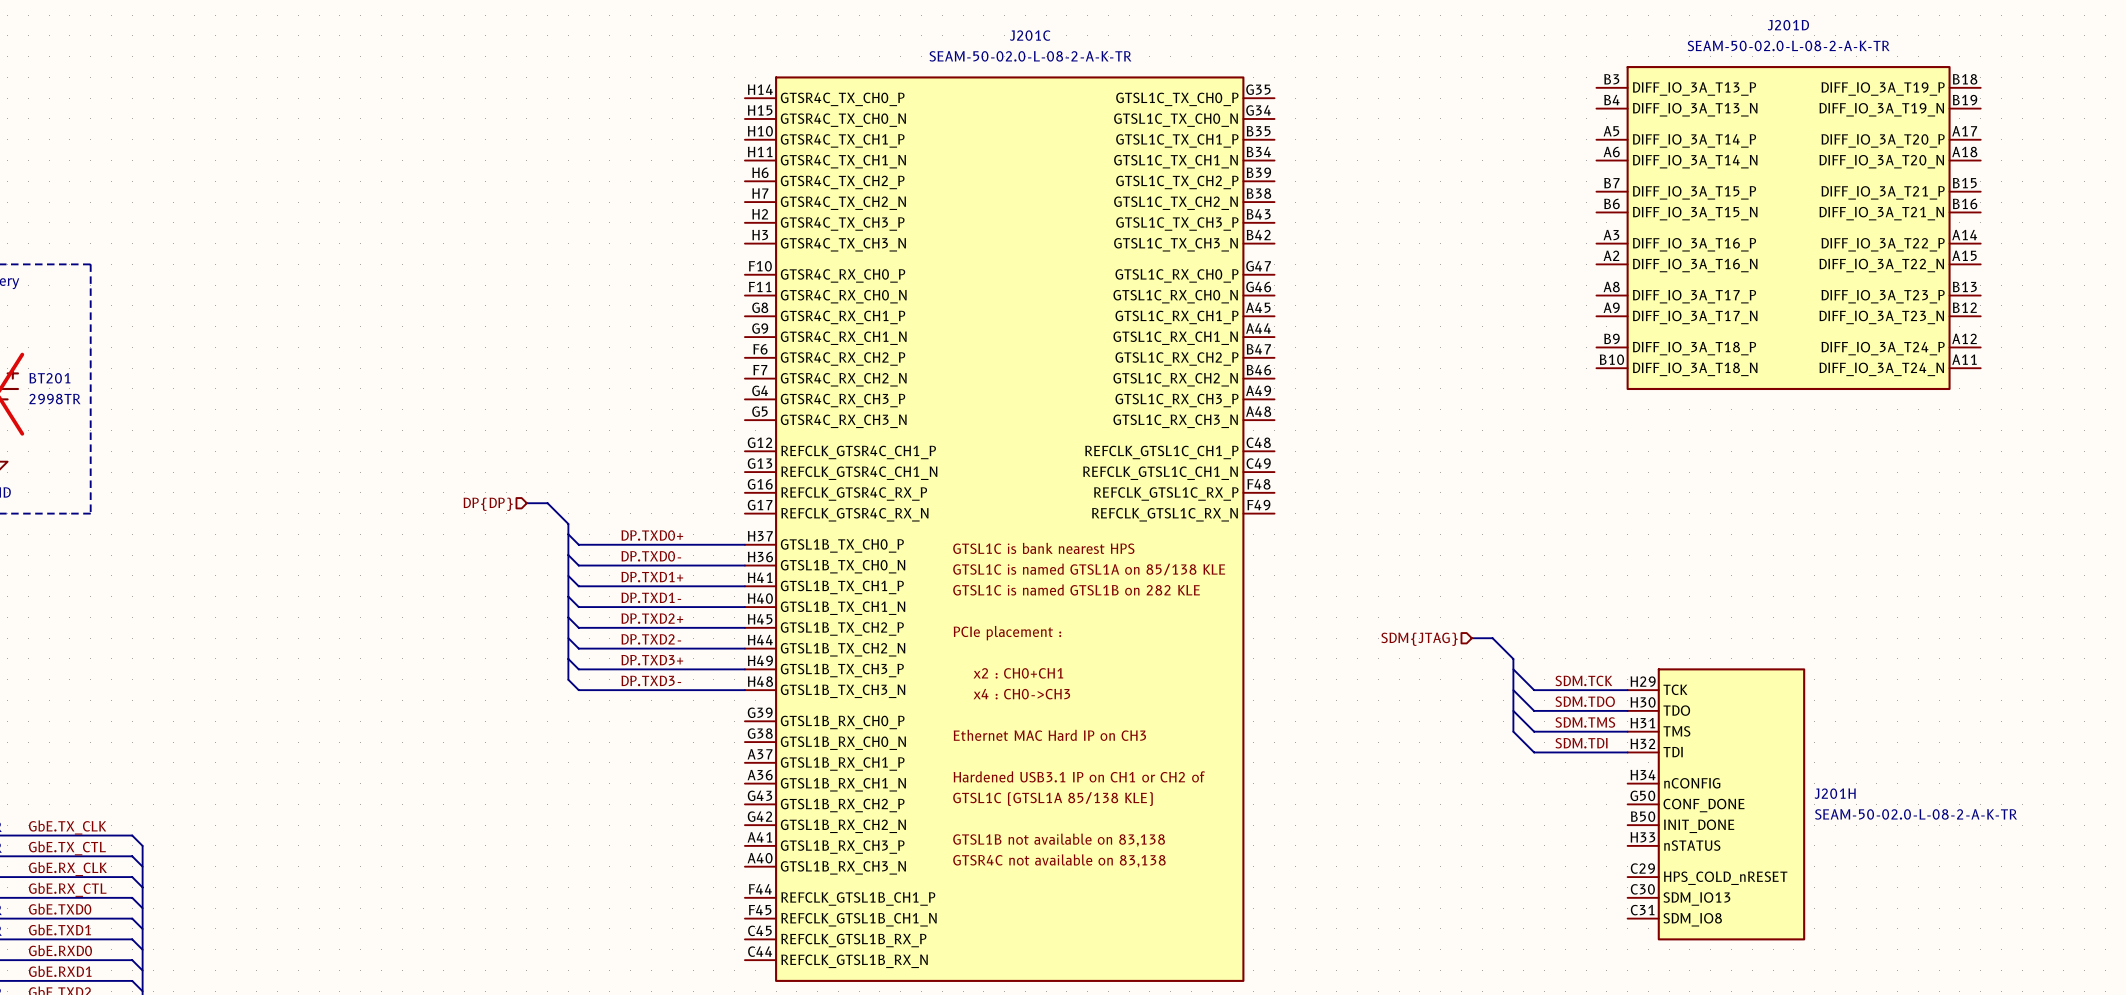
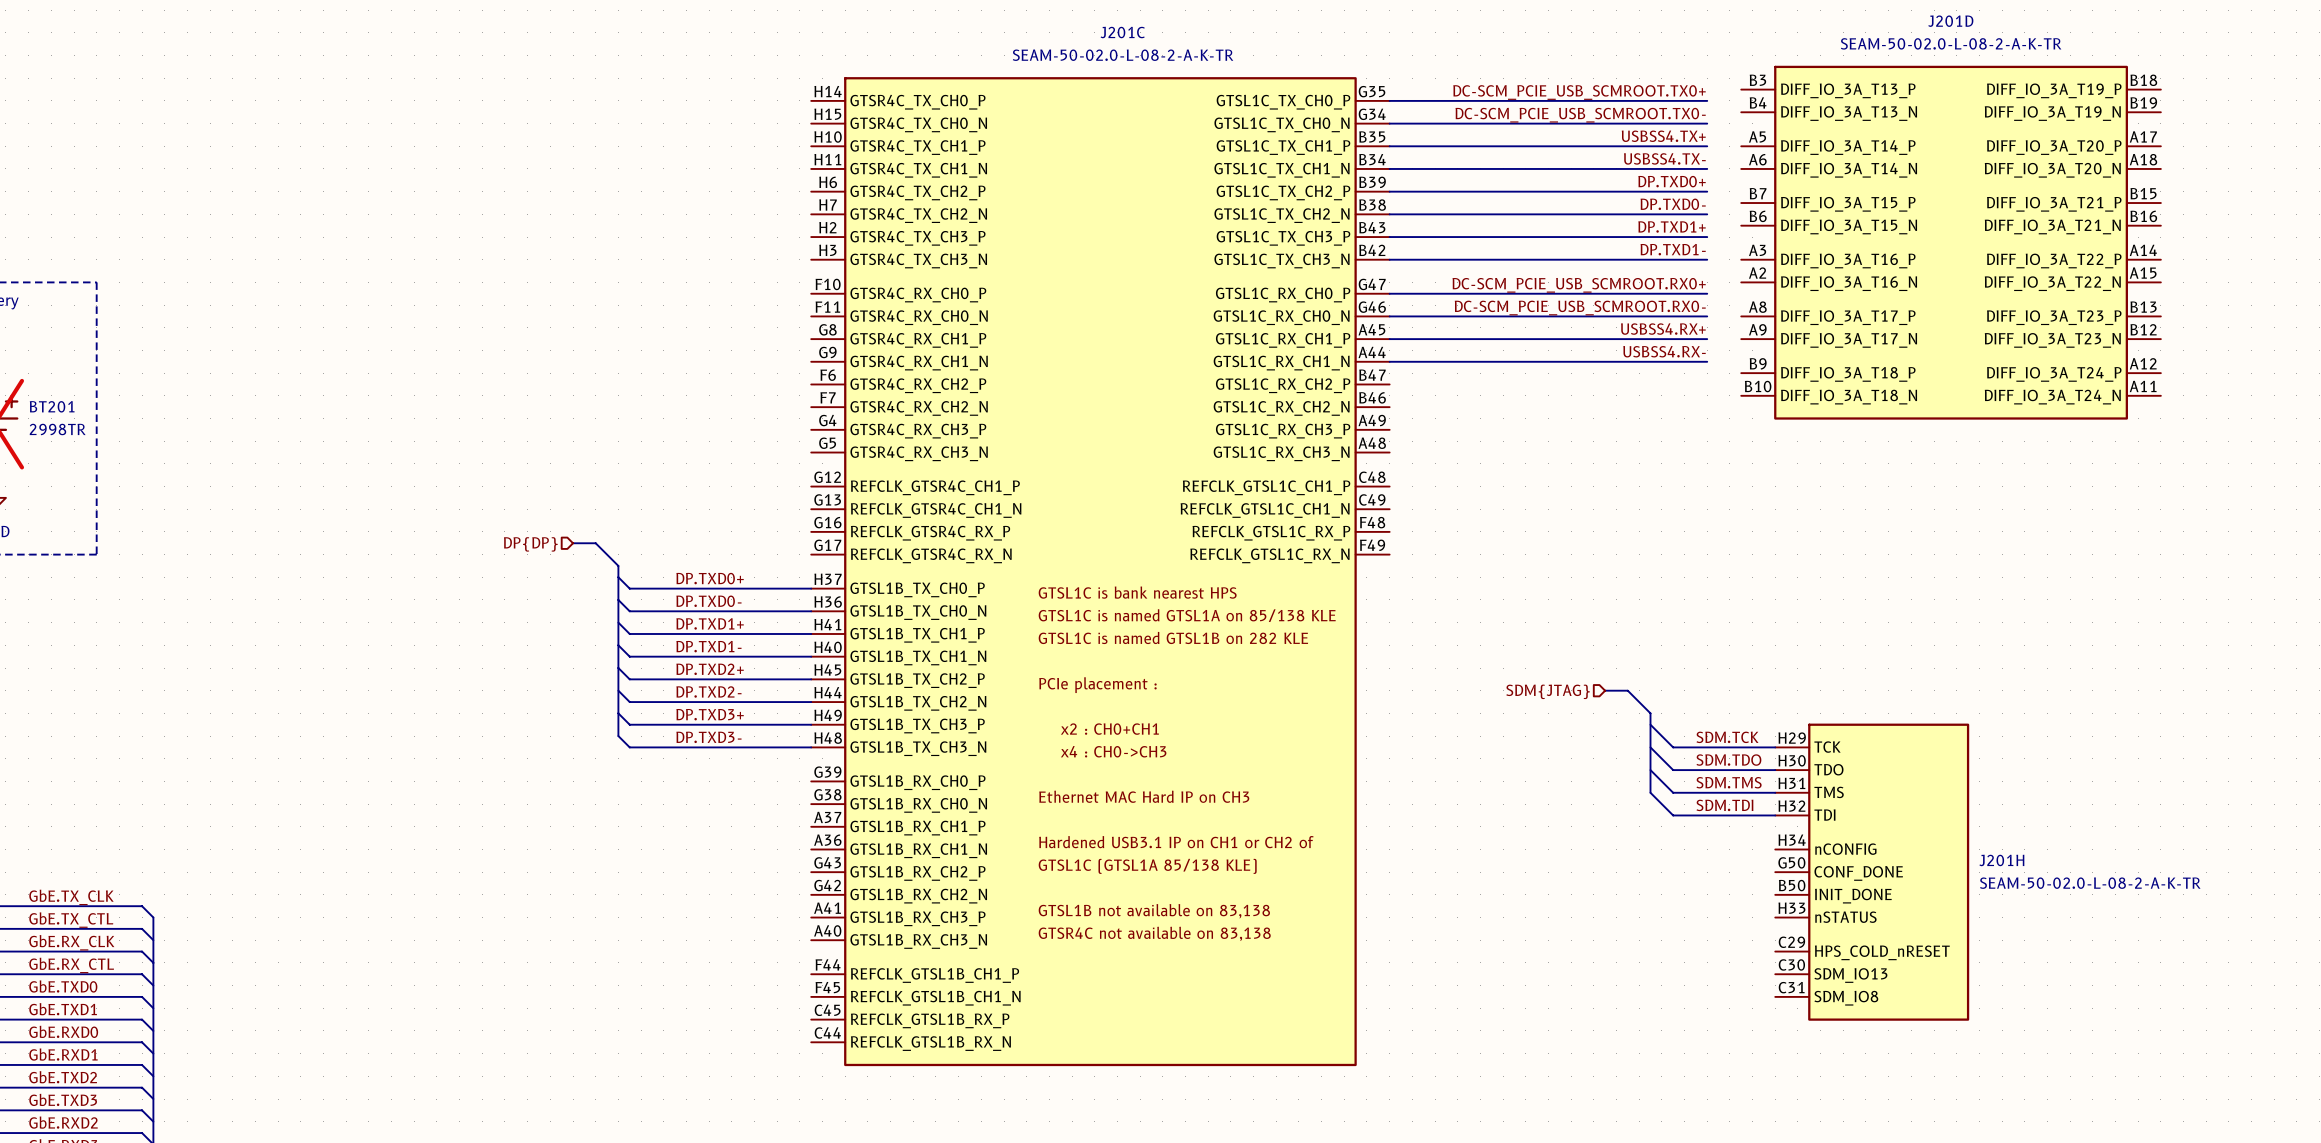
label: none -> DC-SCM_PCIE_USB_SCMROOT.TX0+ (1579, 92)
wire: none -> (1389, 100) (1707, 100)
label: none -> DC-SCM_PCIE_USB_SCMROOT.TX0- (1580, 115)
wire: none -> (1389, 123) (1707, 123)
label: none -> USBSS4.TX+ (1663, 136)
wire: none -> (1389, 146) (1707, 146)
label: none -> USBSS4.TX- (1664, 158)
wire: none -> (1389, 168) (1707, 168)
label: none -> DP.TXD0+ (1672, 181)
wire: none -> (1389, 191) (1707, 191)
label: none -> DP.TXD0- (1673, 204)
wire: none -> (1389, 214) (1707, 214)
label: none -> DP.TXD1+ (1672, 226)
wire: none -> (1389, 237) (1707, 237)
label: none -> DP.TXD1- (1673, 249)
wire: none -> (1389, 259) (1707, 259)
label: none -> DC-SCM_PCIE_USB_SCMROOT.RX0+ (1579, 285)
wire: none -> (1389, 293) (1707, 293)
label: none -> DC-SCM_PCIE_USB_SCMROOT.RX0- (1580, 308)
wire: none -> (1389, 316) (1707, 316)
label: none -> USBSS4.RX+ (1663, 329)
wire: none -> (1389, 339) (1707, 339)
label: none -> USBSS4.RX- (1664, 351)
wire: none -> (1389, 361) (1707, 361)

